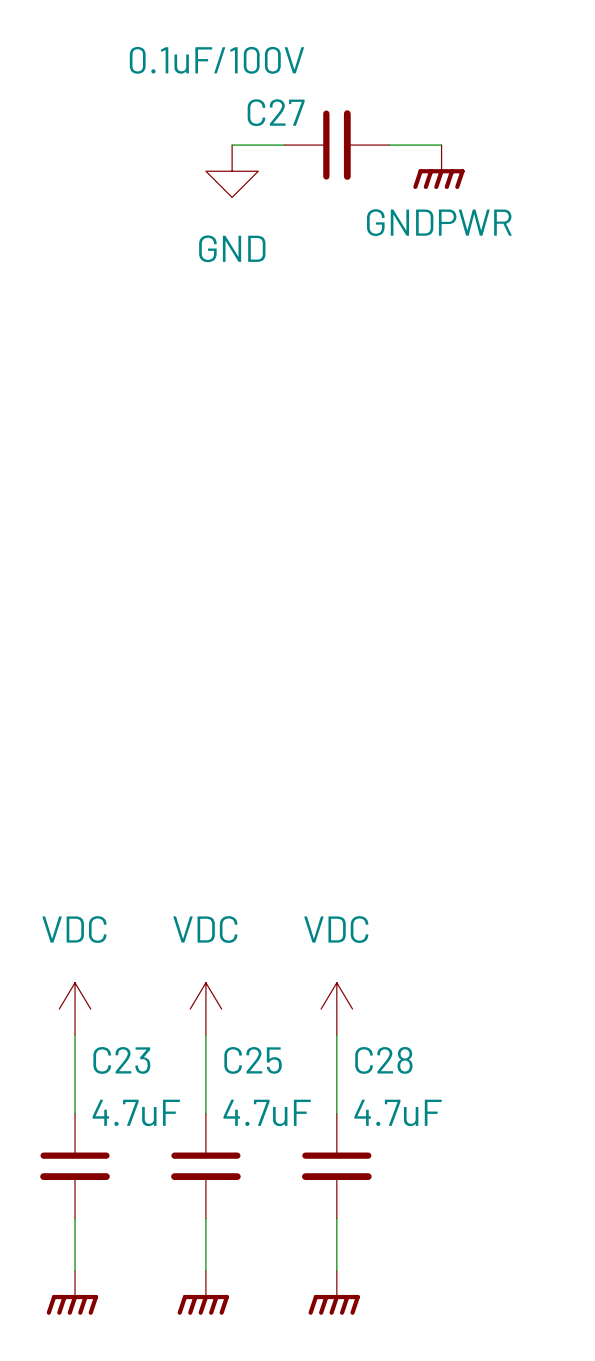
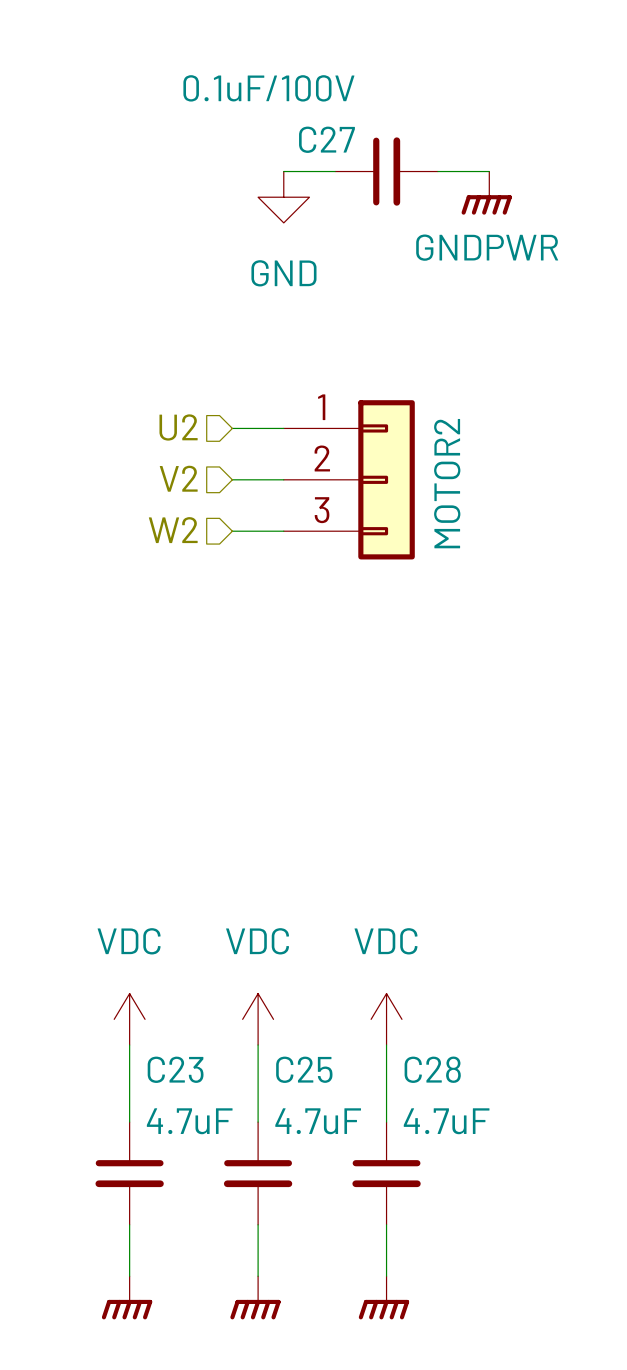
hierarchical label: none -> U2 (178, 427)
wire: none -> (232, 428) (283, 428)
hierarchical label: none -> V2 (178, 478)
wire: none -> (232, 479) (283, 479)
MOTOR2: none -> (349, 479)
hierarchical label: none -> W2 (173, 530)
wire: none -> (232, 531) (283, 531)

